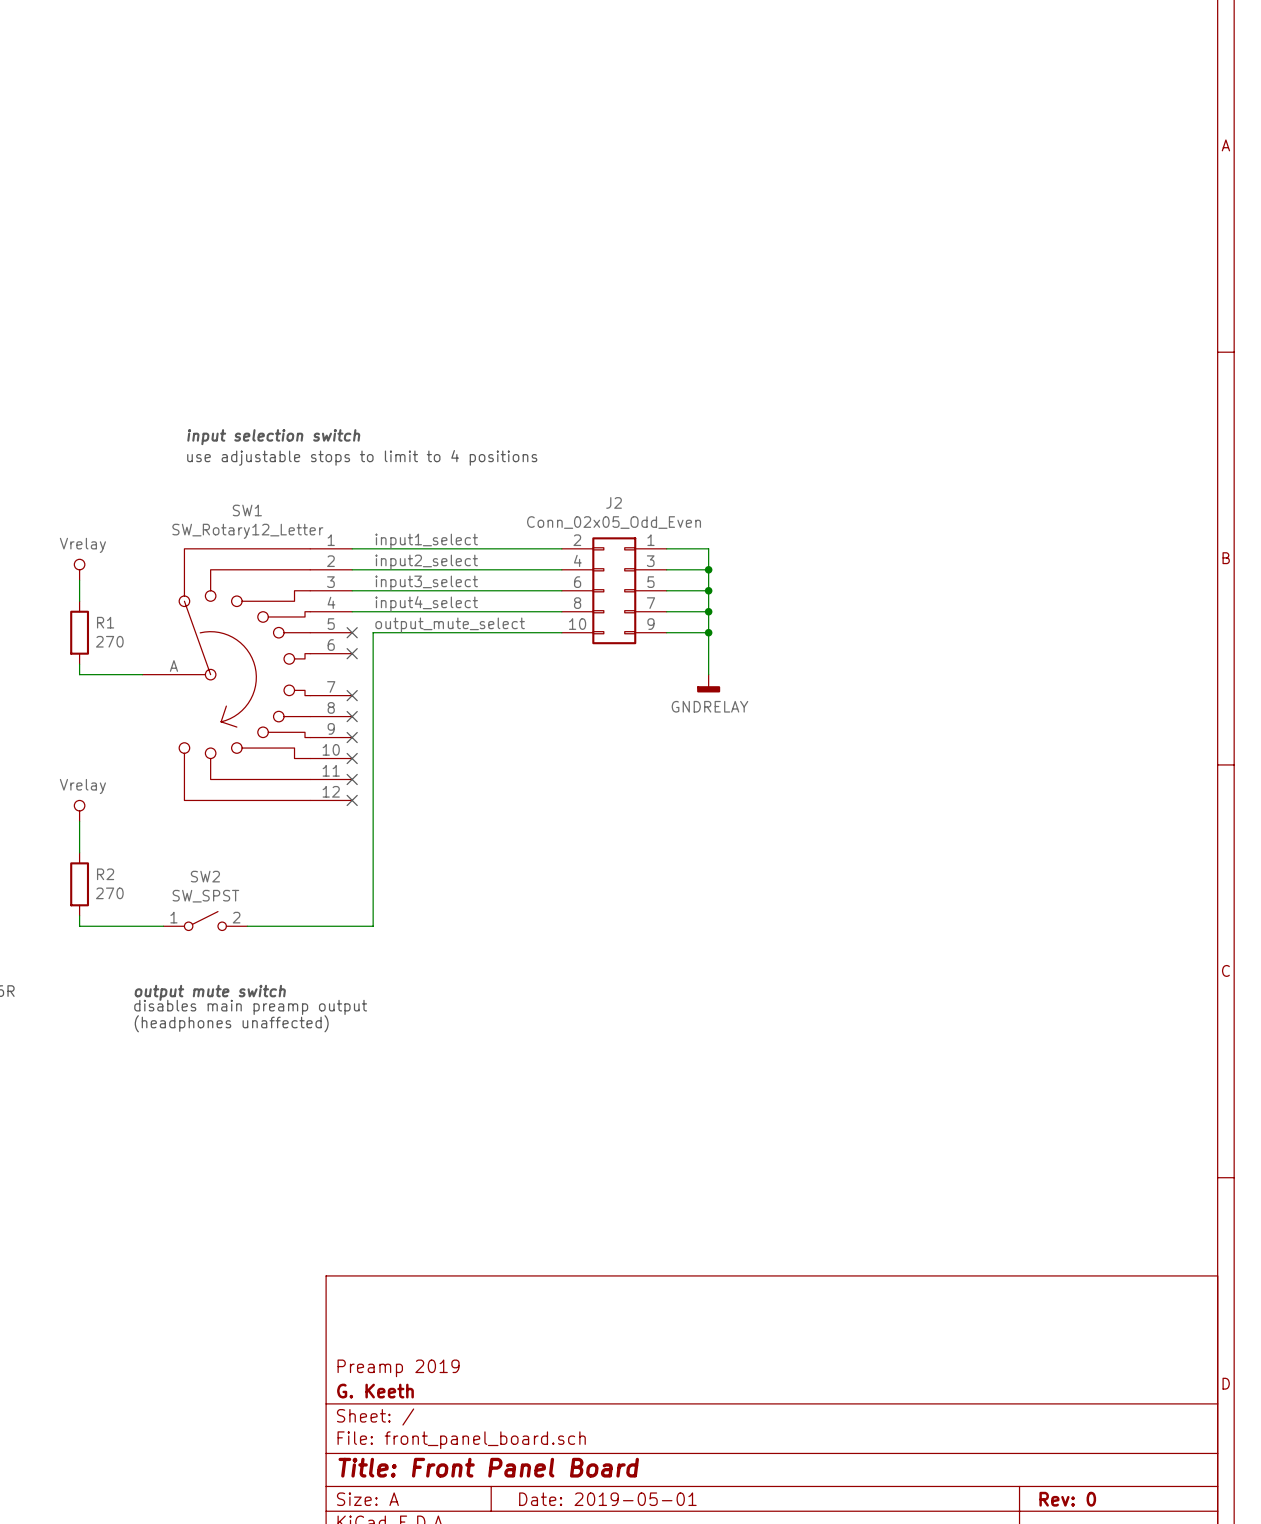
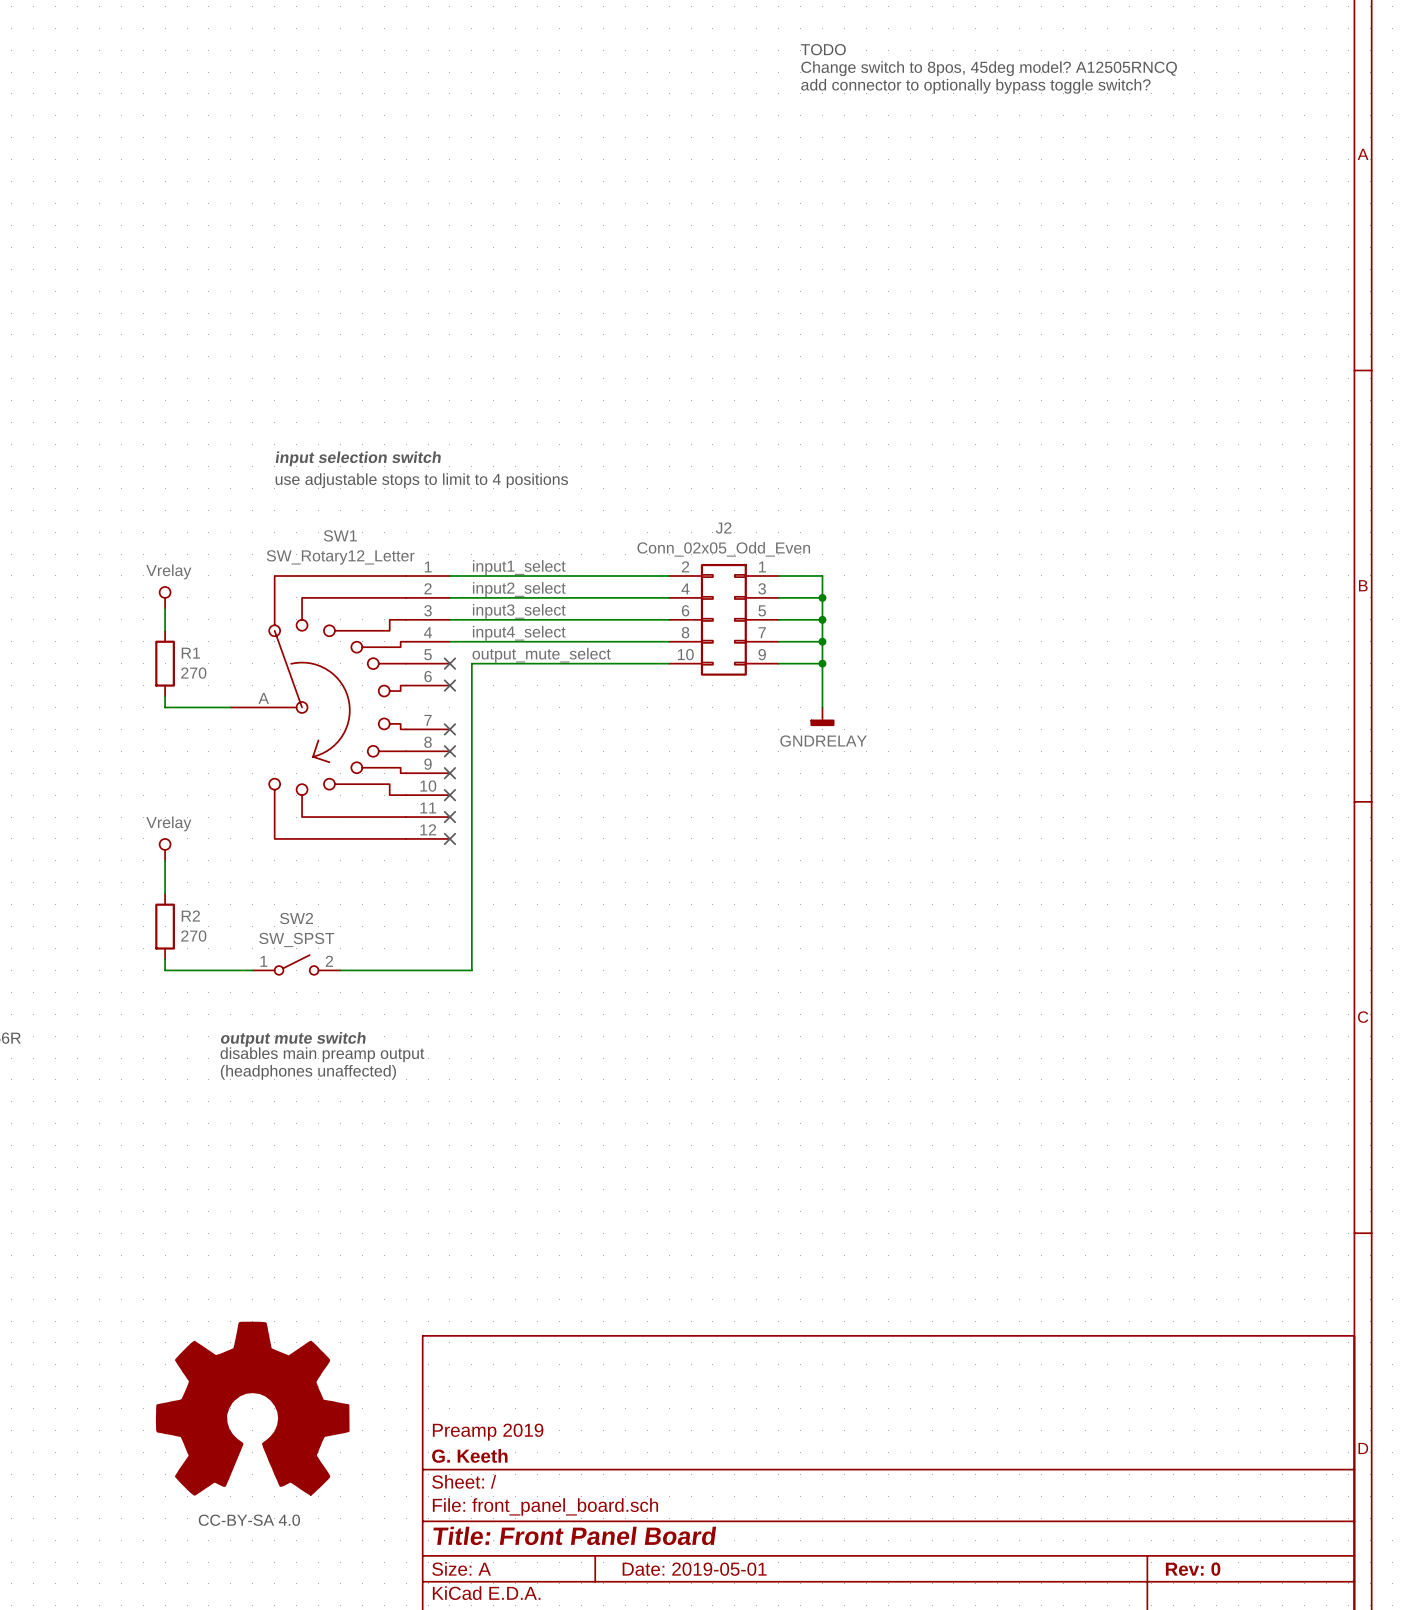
text: none -> TODO (823, 49)
text: none -> Change switch to 8pos, 45deg model? A12505RNCQ (989, 68)
text: none -> add connector to optionally bypass toggle switch? (975, 86)
power symbol: none -> (252, 1408)
text: none -> CC-BY-SA 4.0 (249, 1520)

